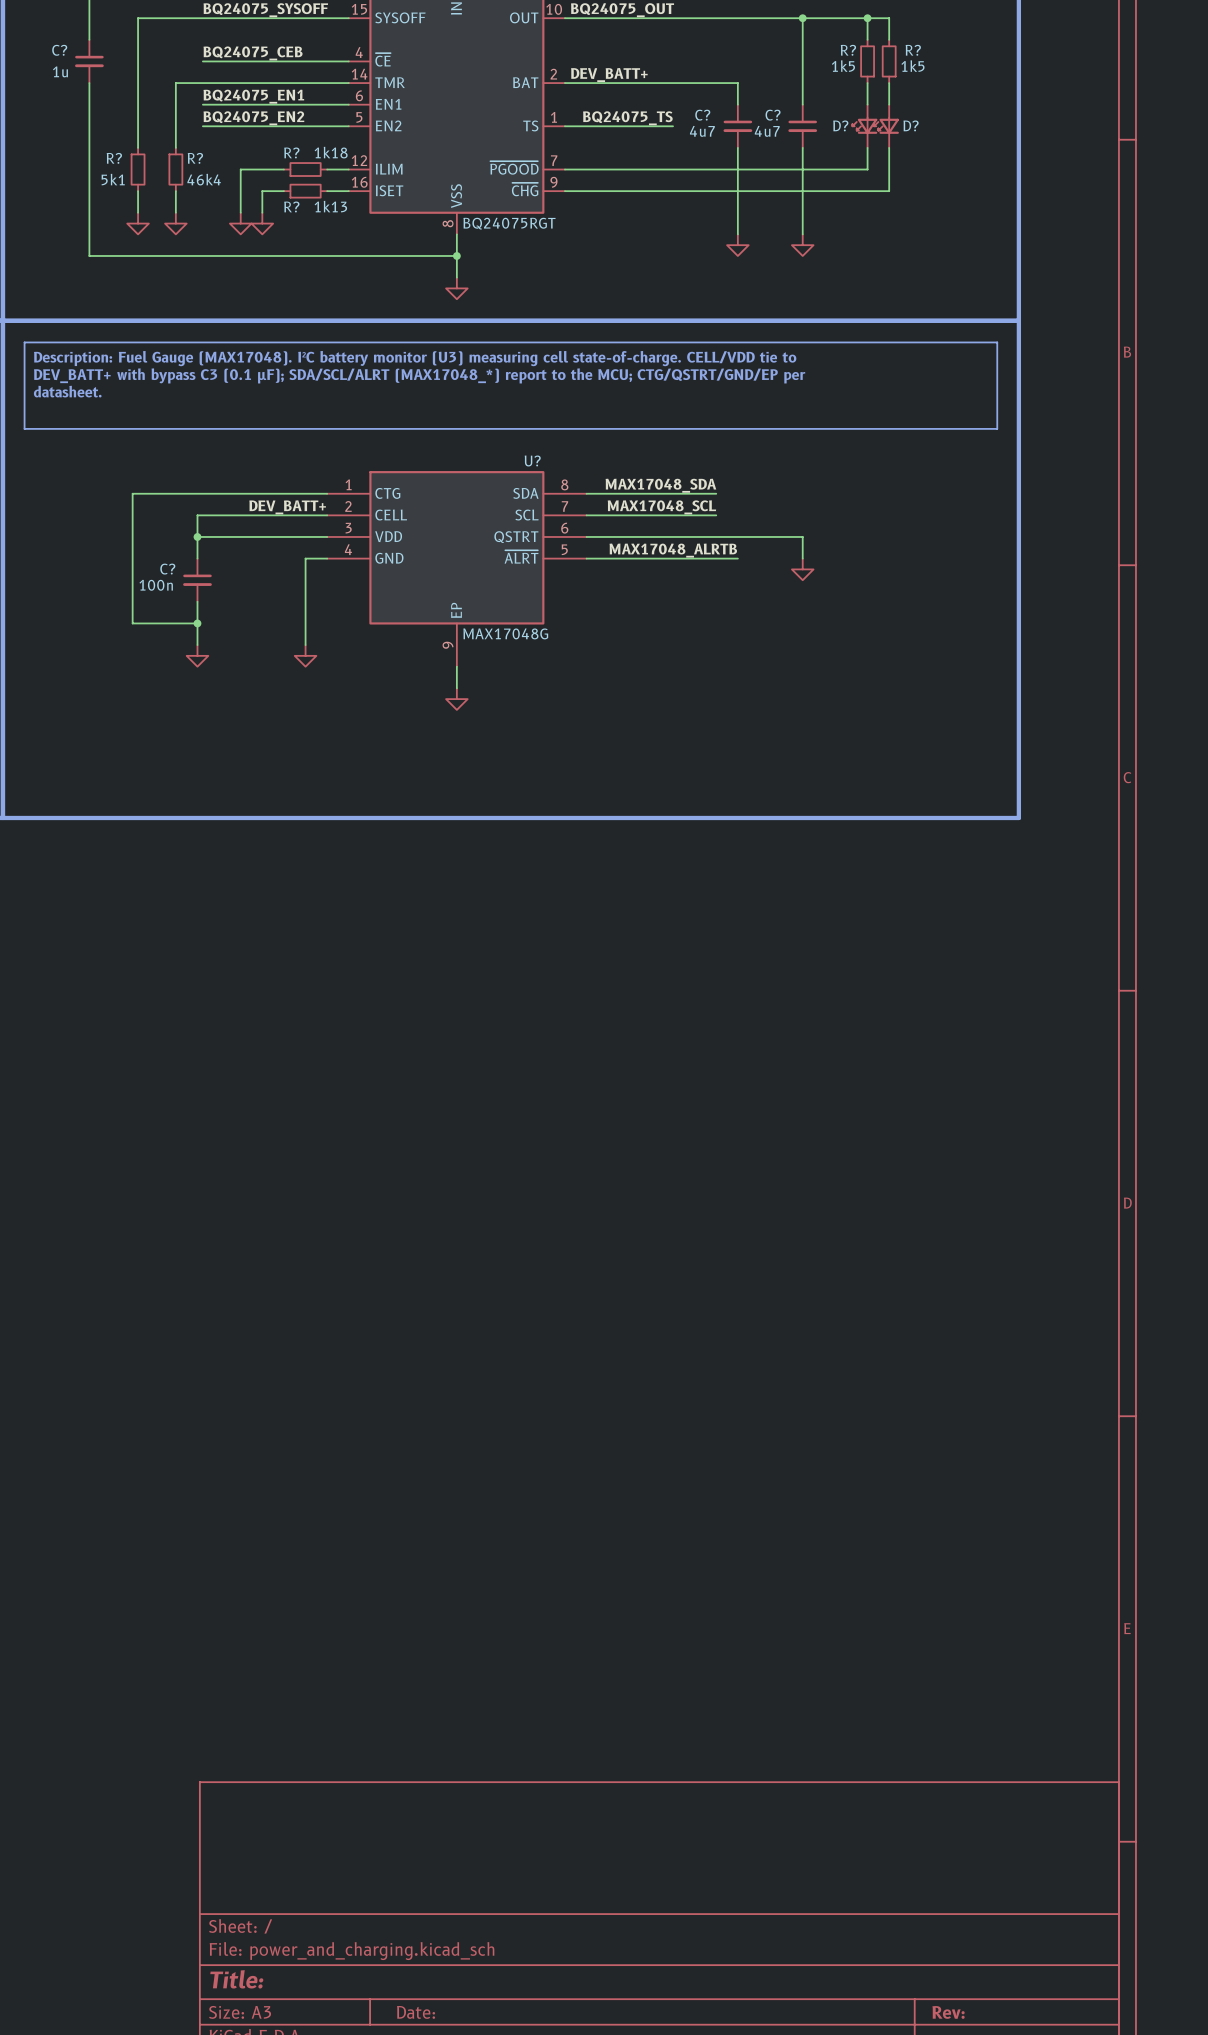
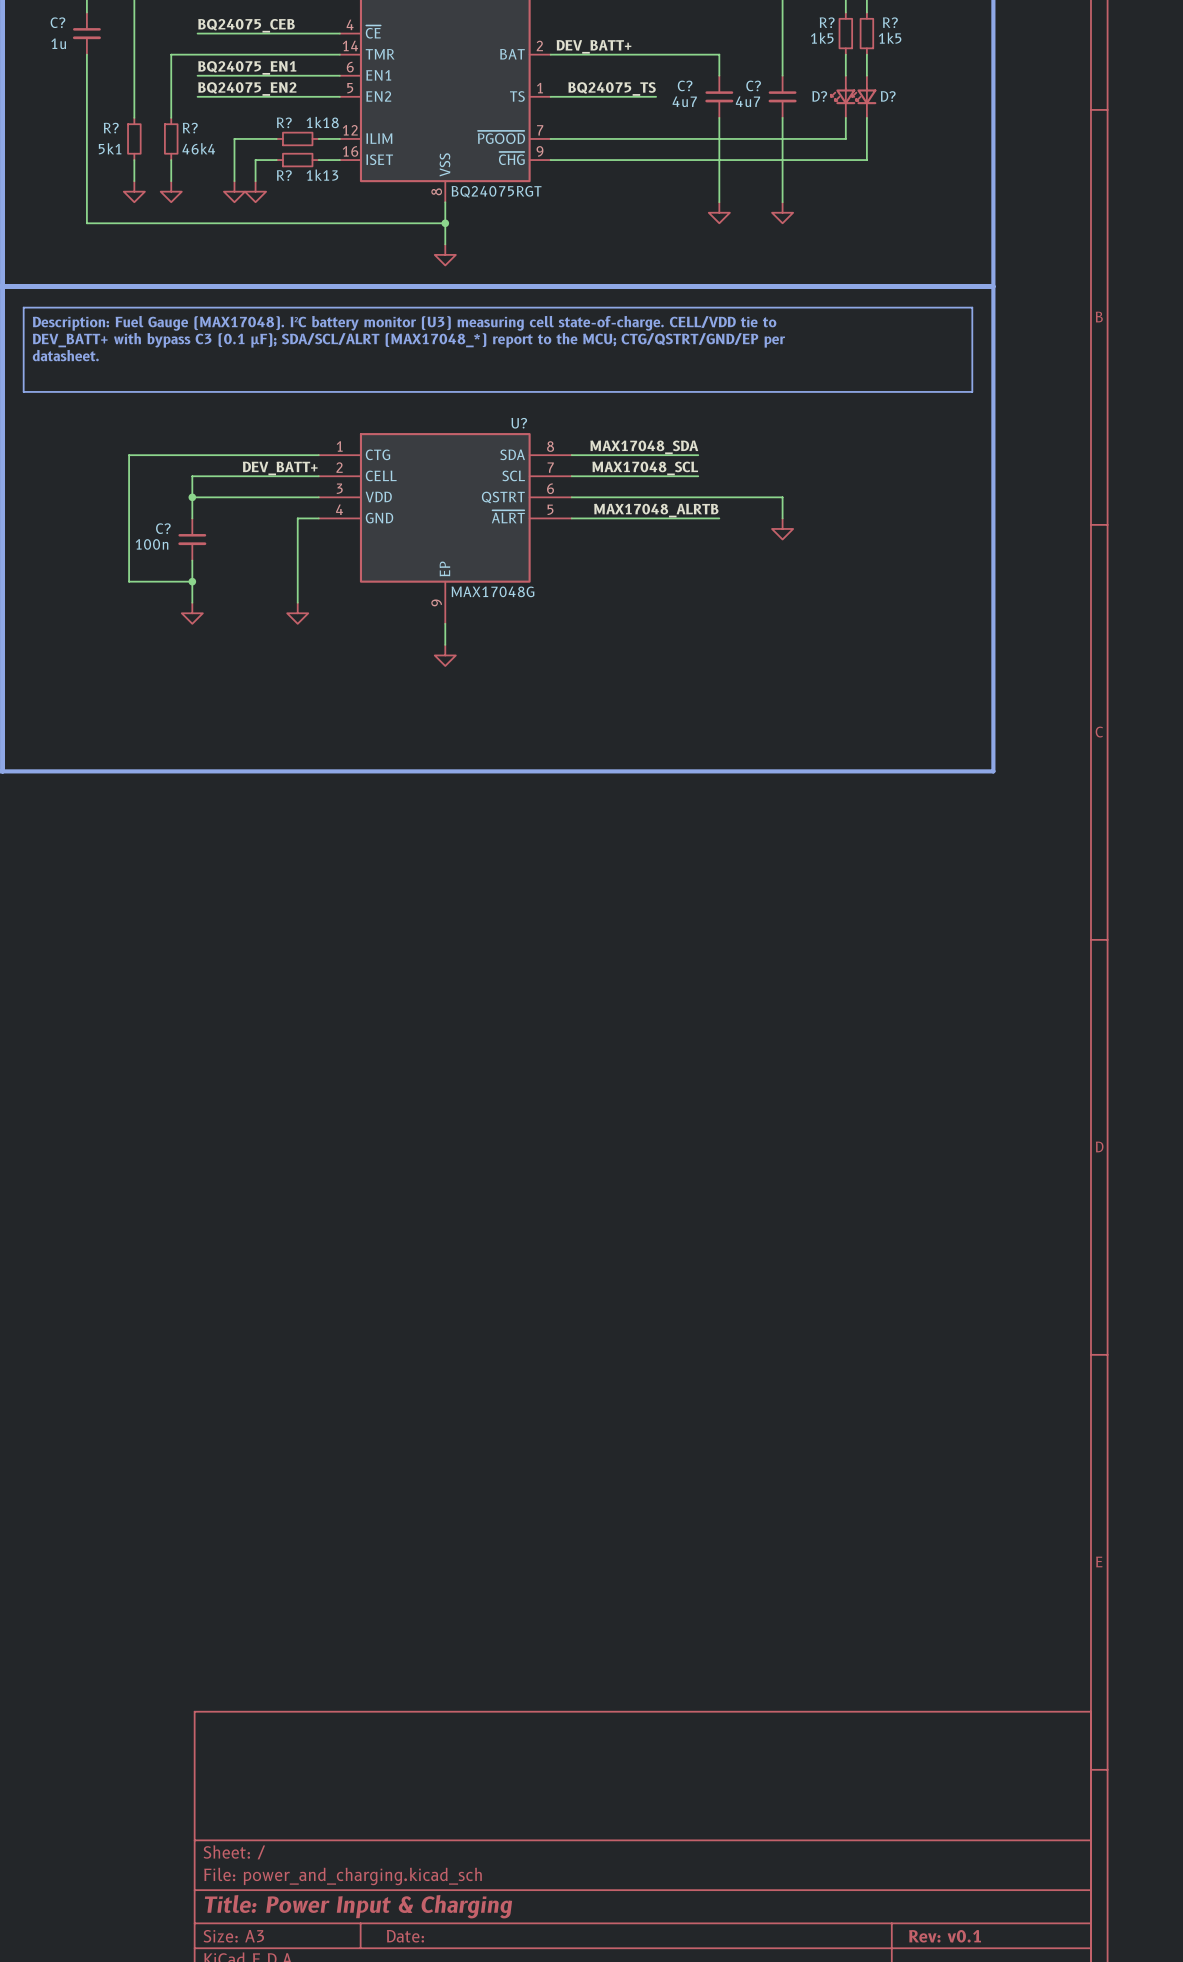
title block: Title: (236, 1979) -> Title: Power Input & Charging (358, 1906)
title block: Rev: (948, 2012) -> Rev: v0.1 (945, 1936)

